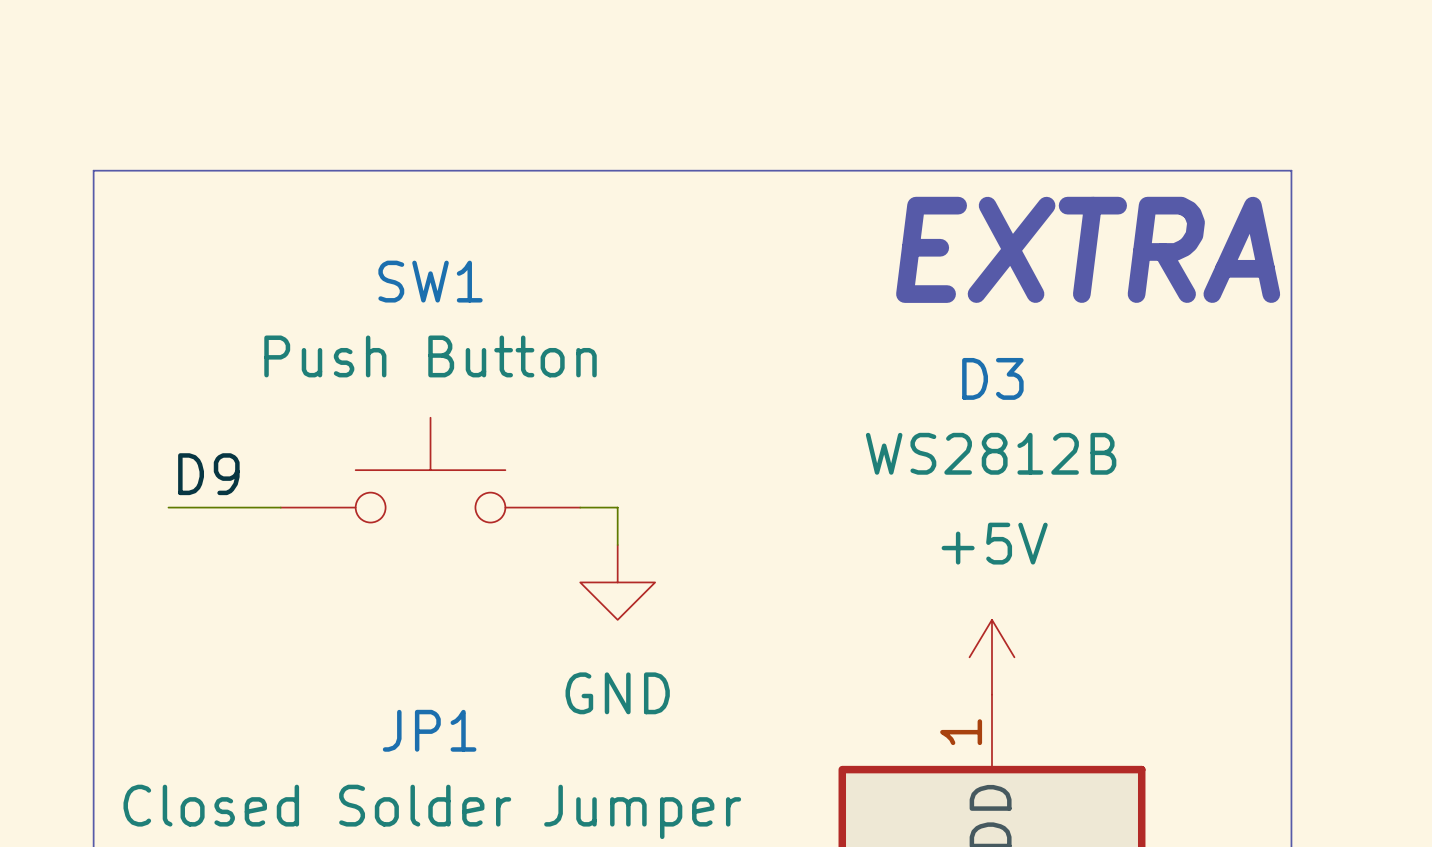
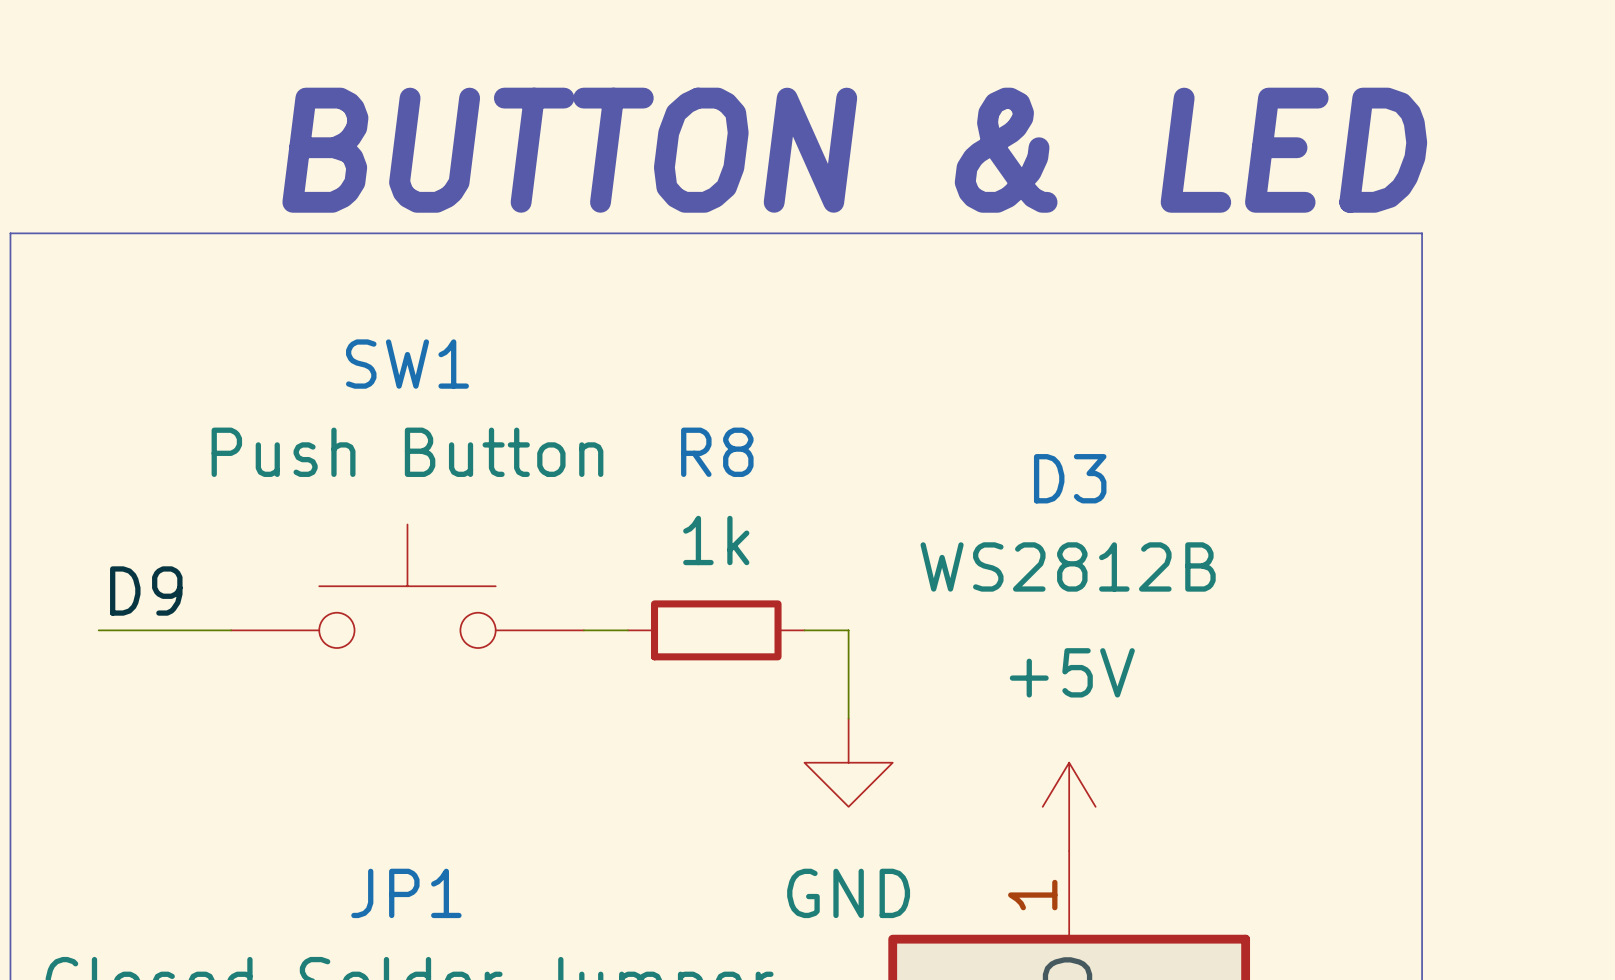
text: none -> BUTTON & LED (854, 150)
text: EXTRA (1088, 249) -> none
wire: (617, 507) (617, 545) -> none
R8: none -> 1k (716, 630)
wire: none -> (804, 630) (848, 630) (848, 718)
power symbol position: GND (617, 582) -> GND (848, 762)

